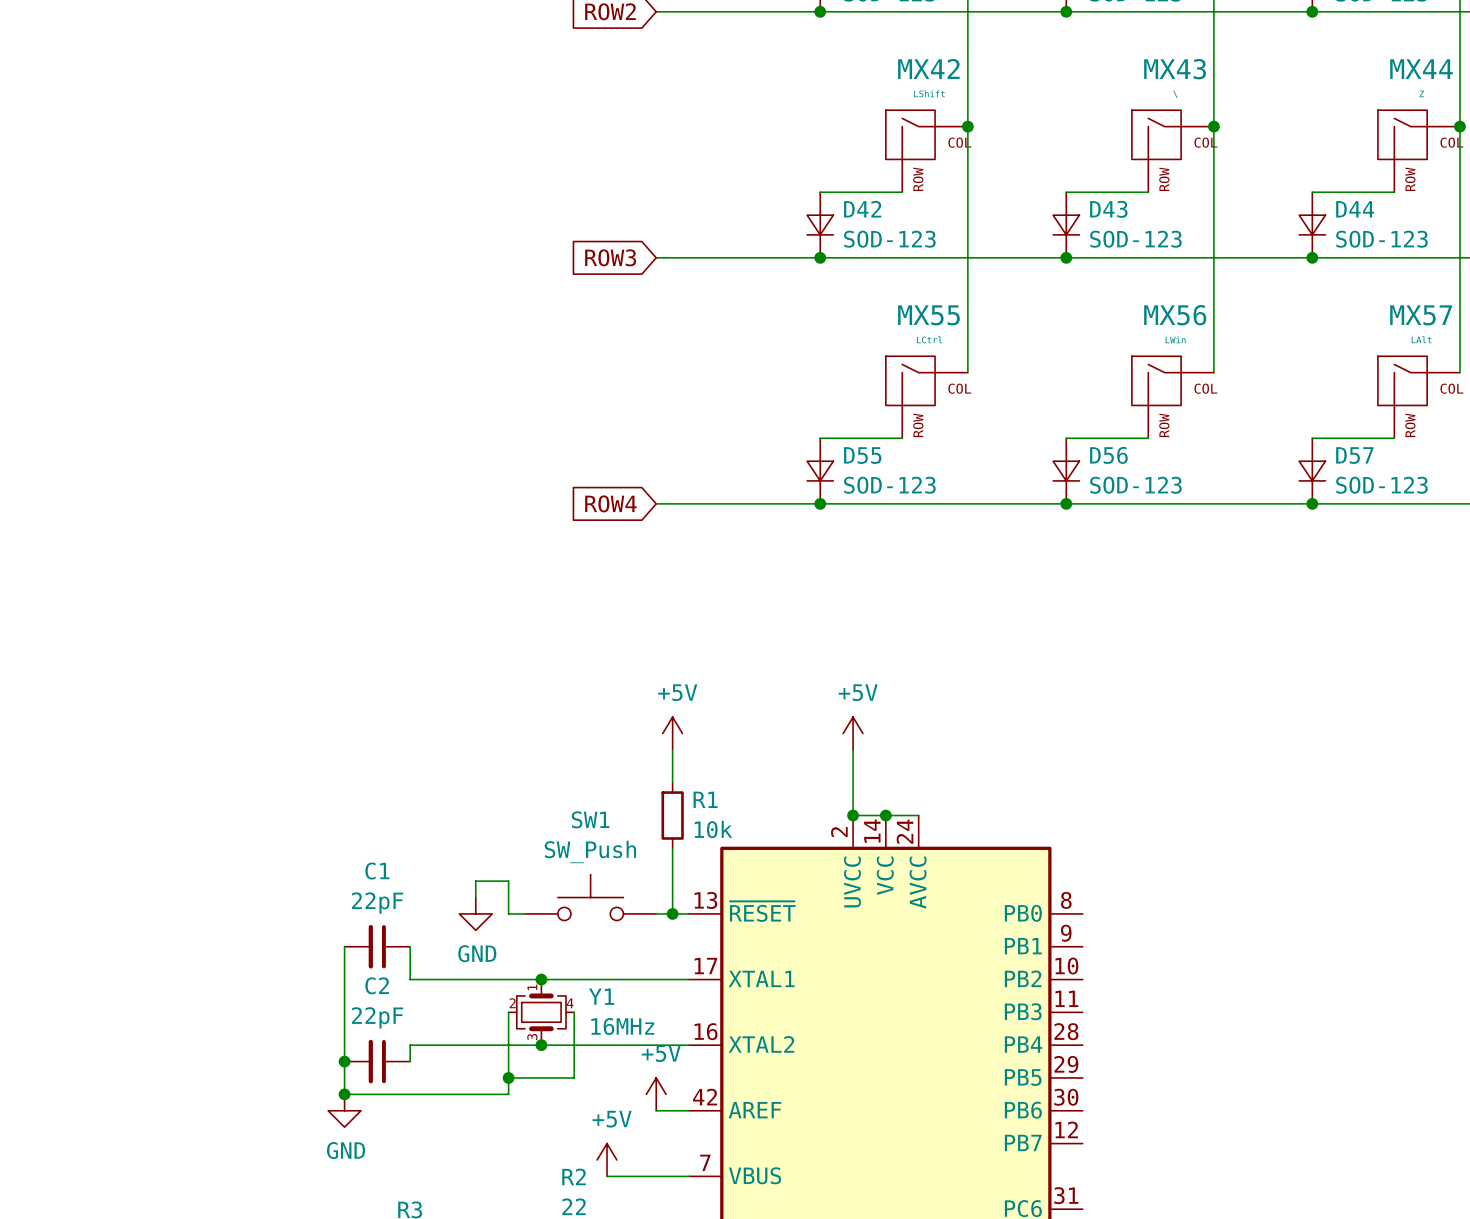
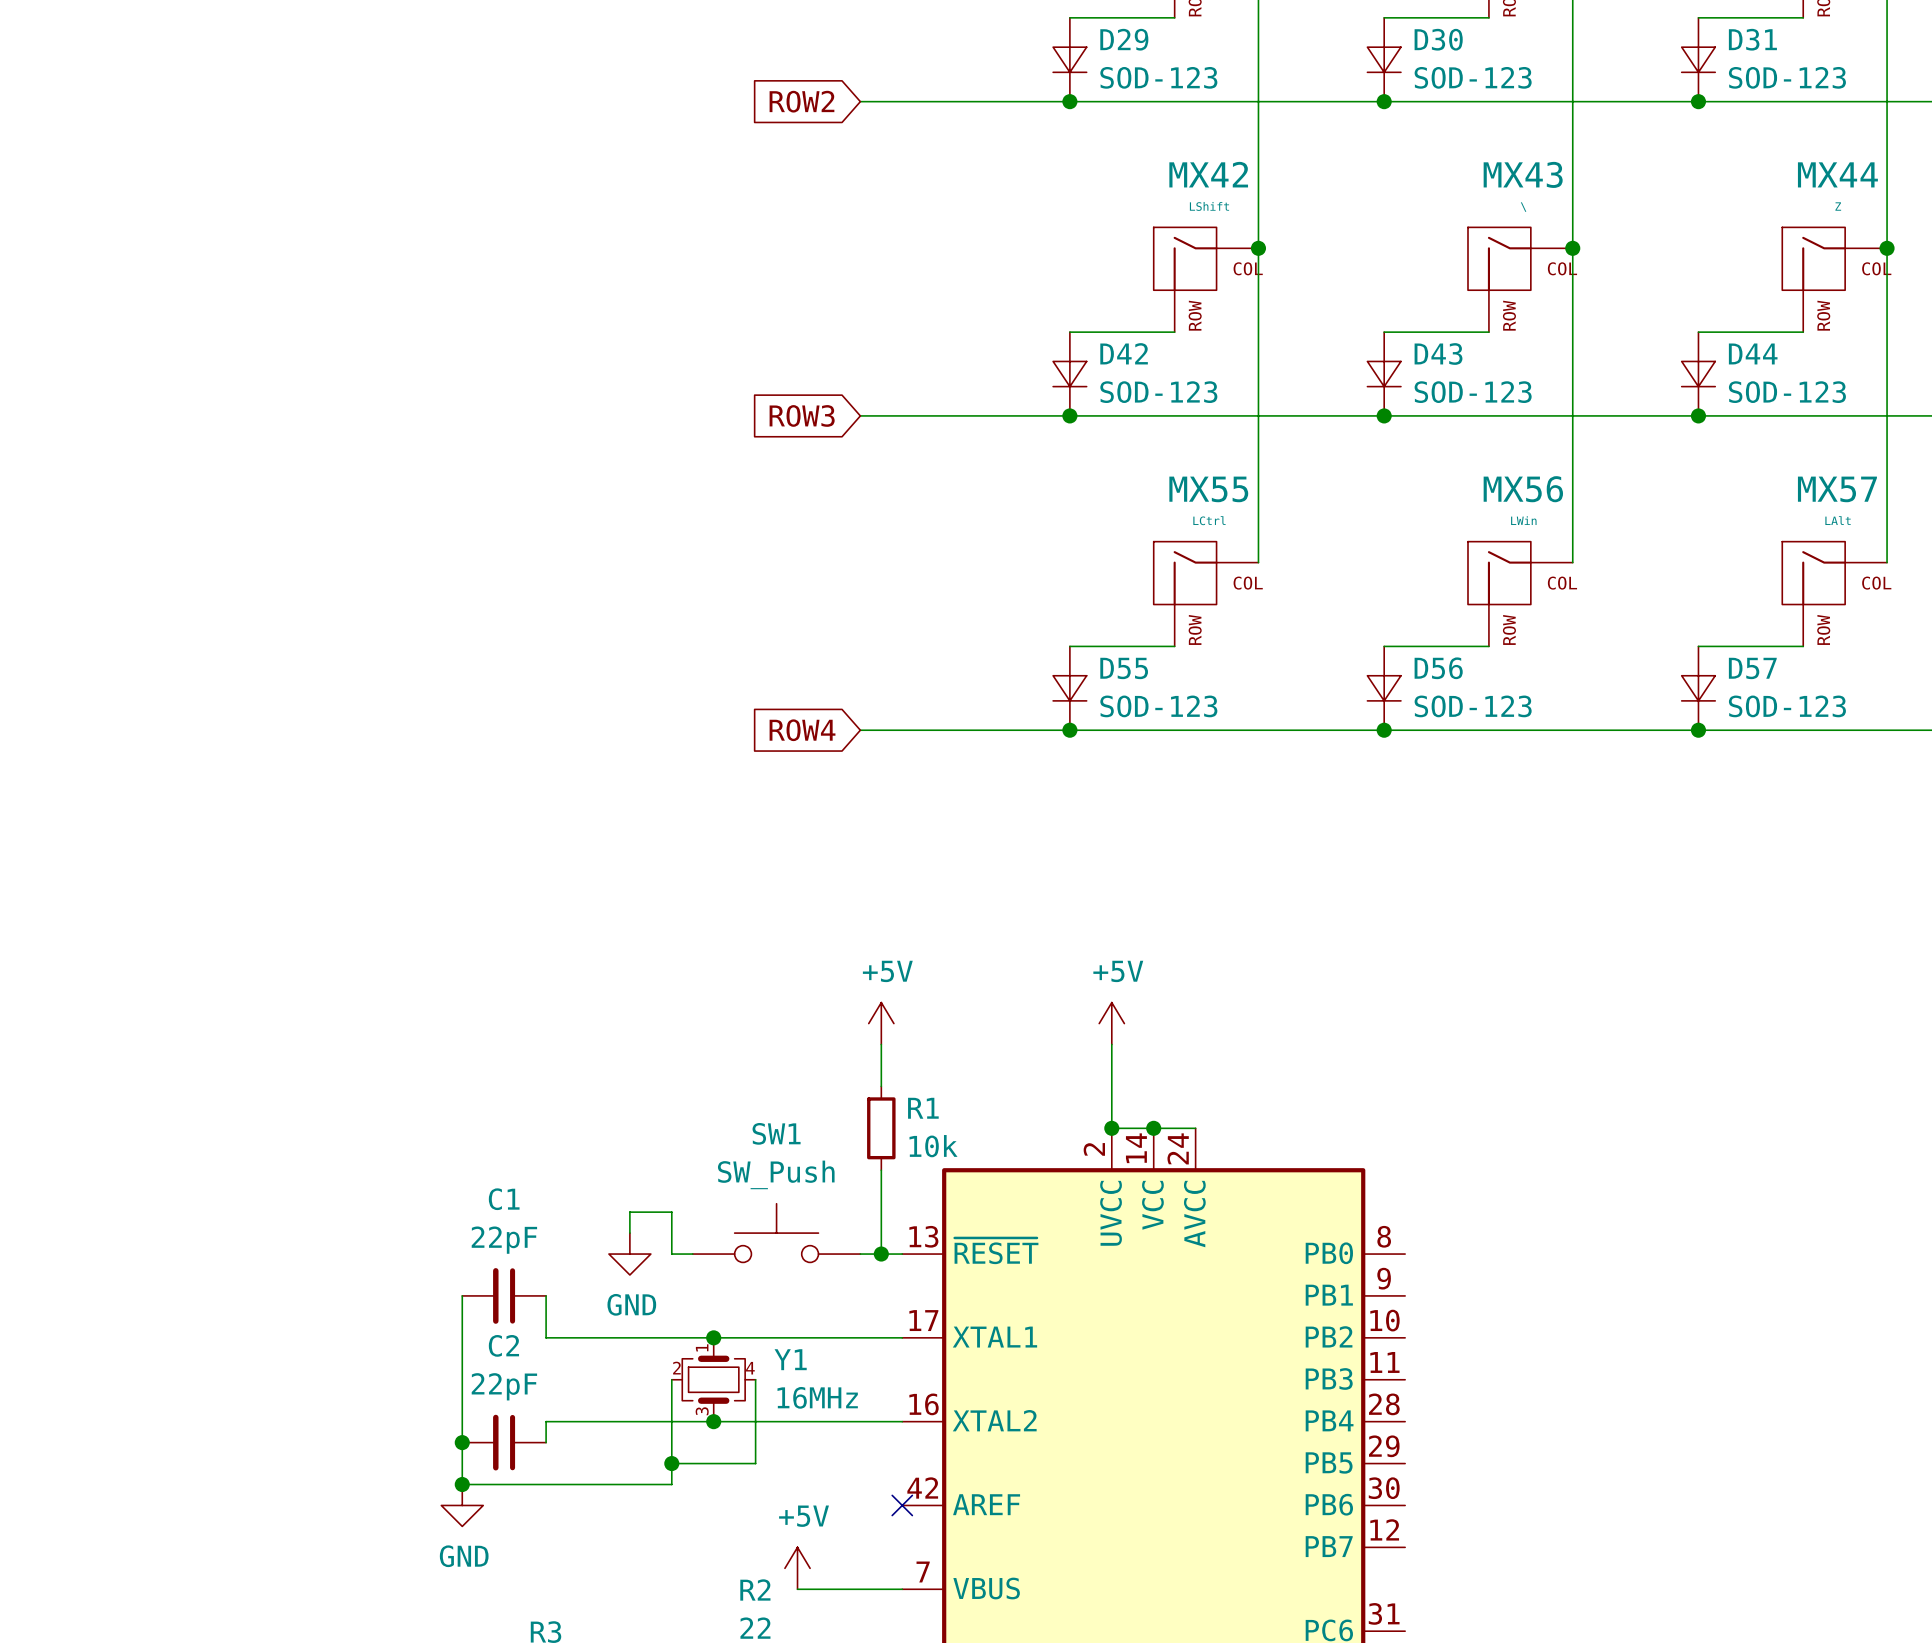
power symbol: +5V (656, 1094) -> none
wire: (656, 1110) (689, 1110) -> none
no-connect mark: none -> (902, 1505)

